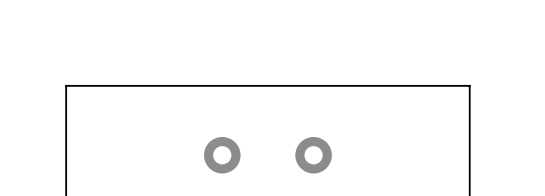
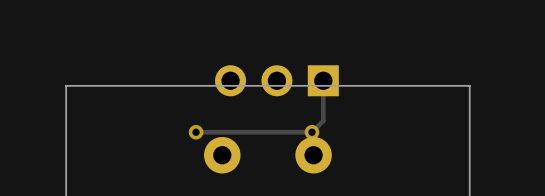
part: none -> (276, 80)
track: none -> (323, 83) (323, 120) (312, 132) (196, 132)
via: none -> (196, 132)
via: none -> (312, 132)

